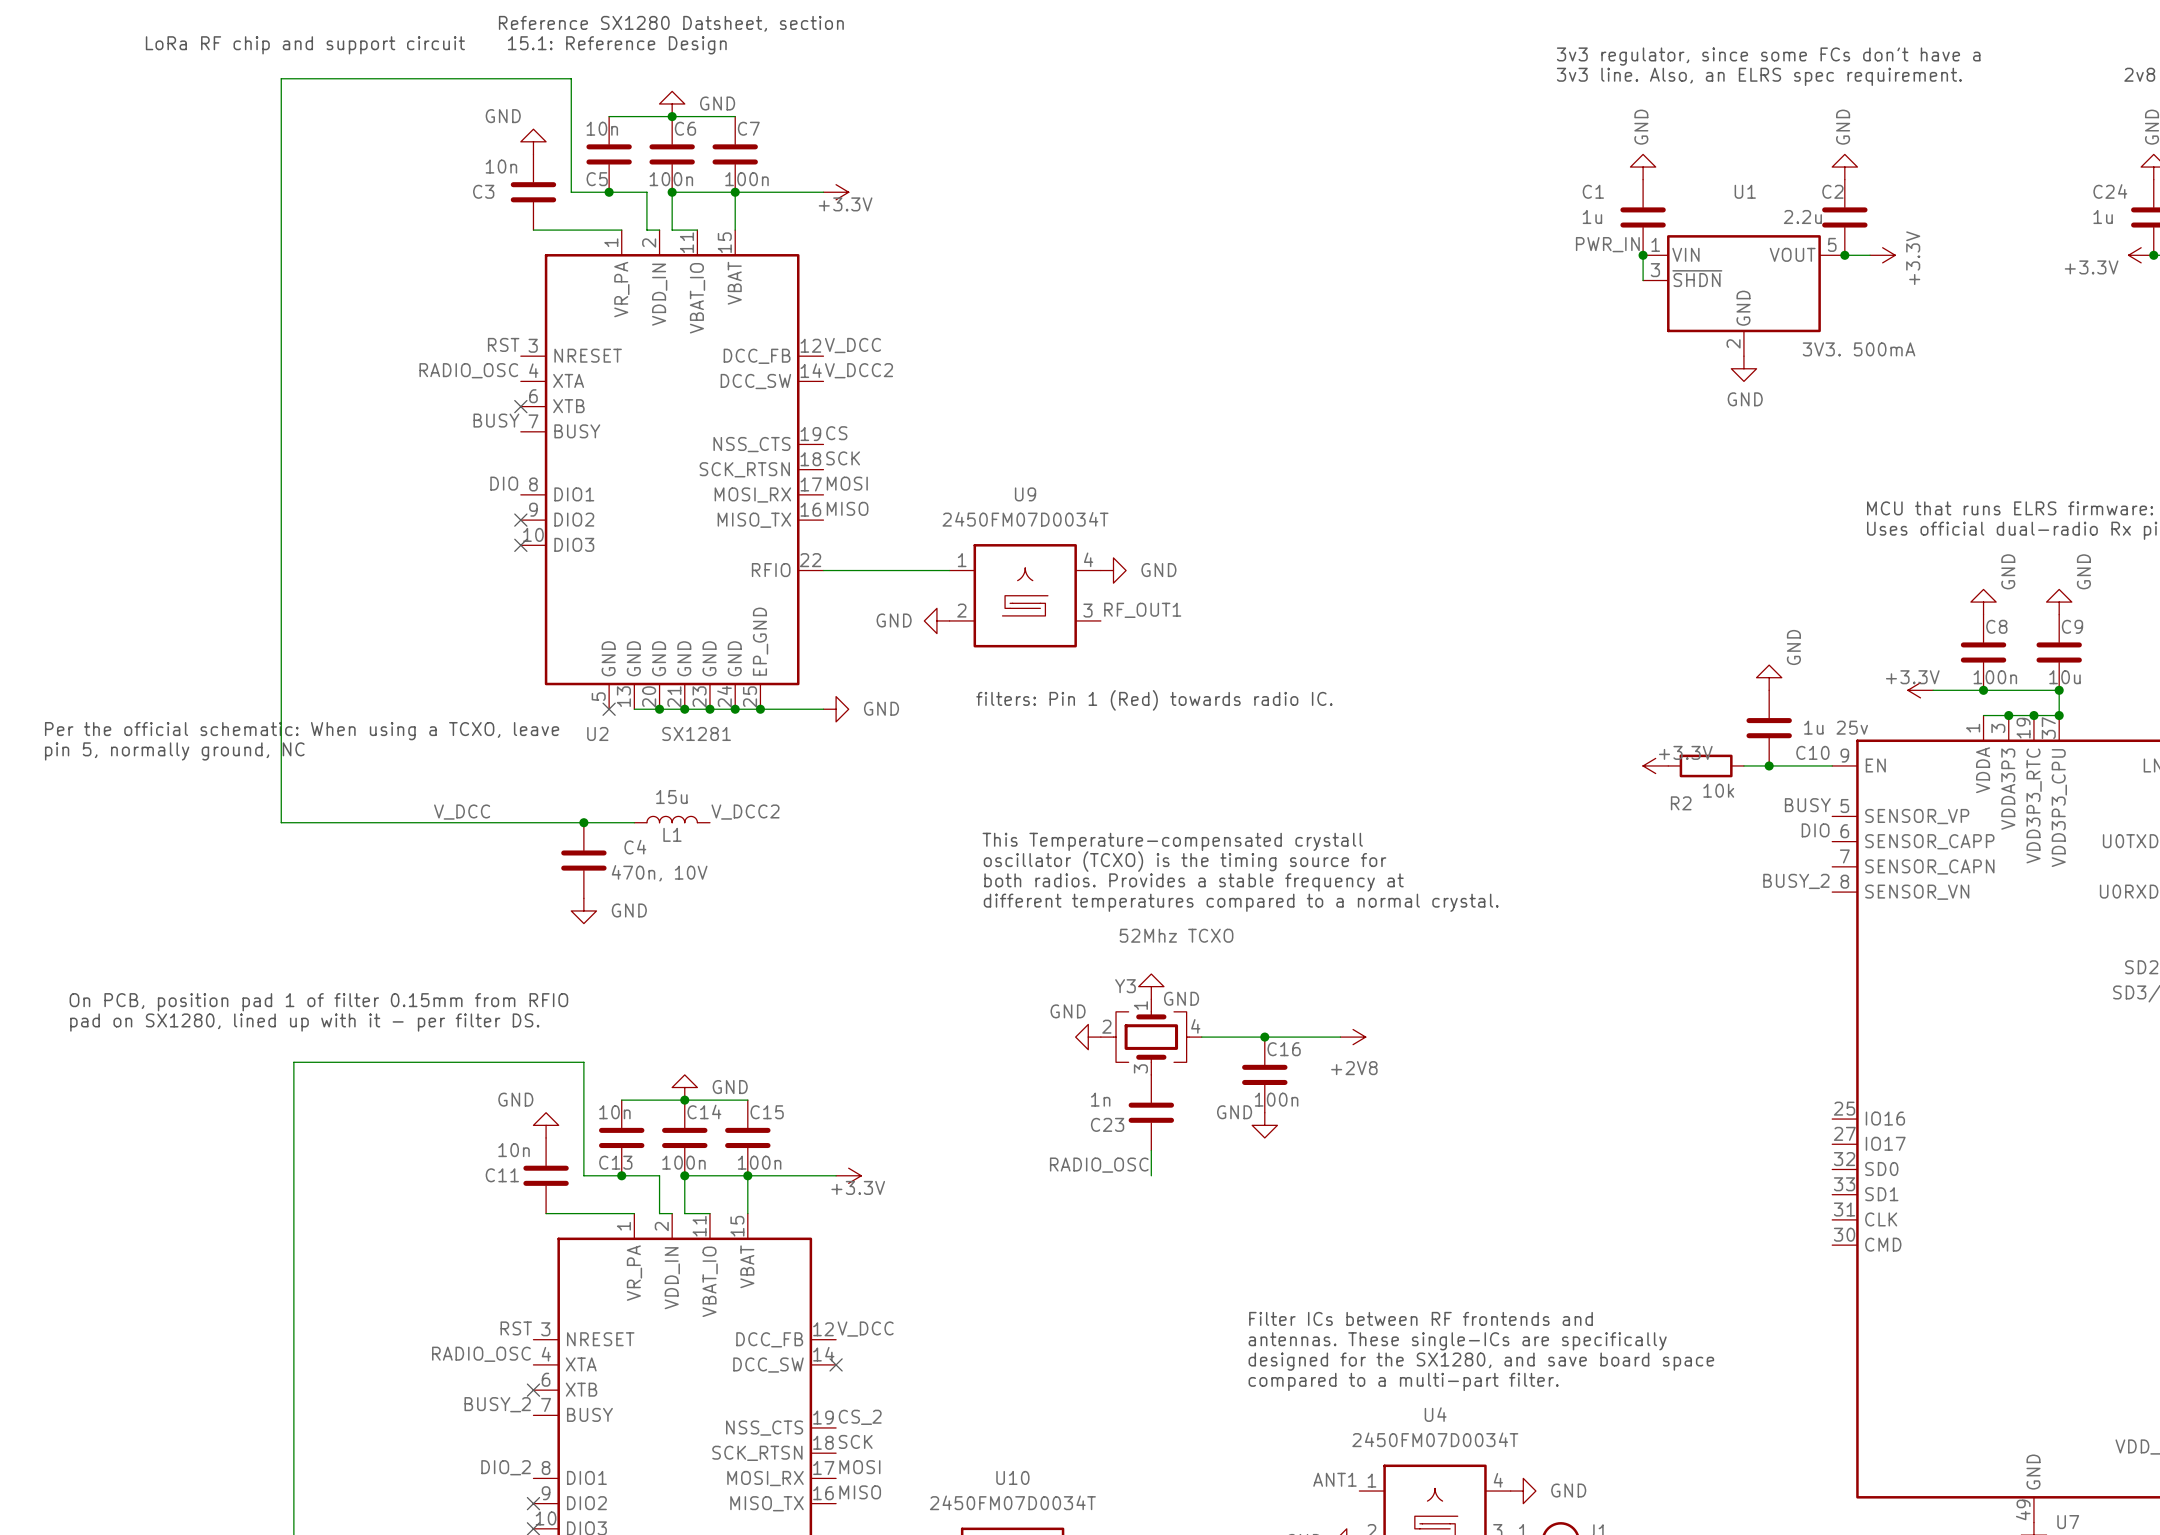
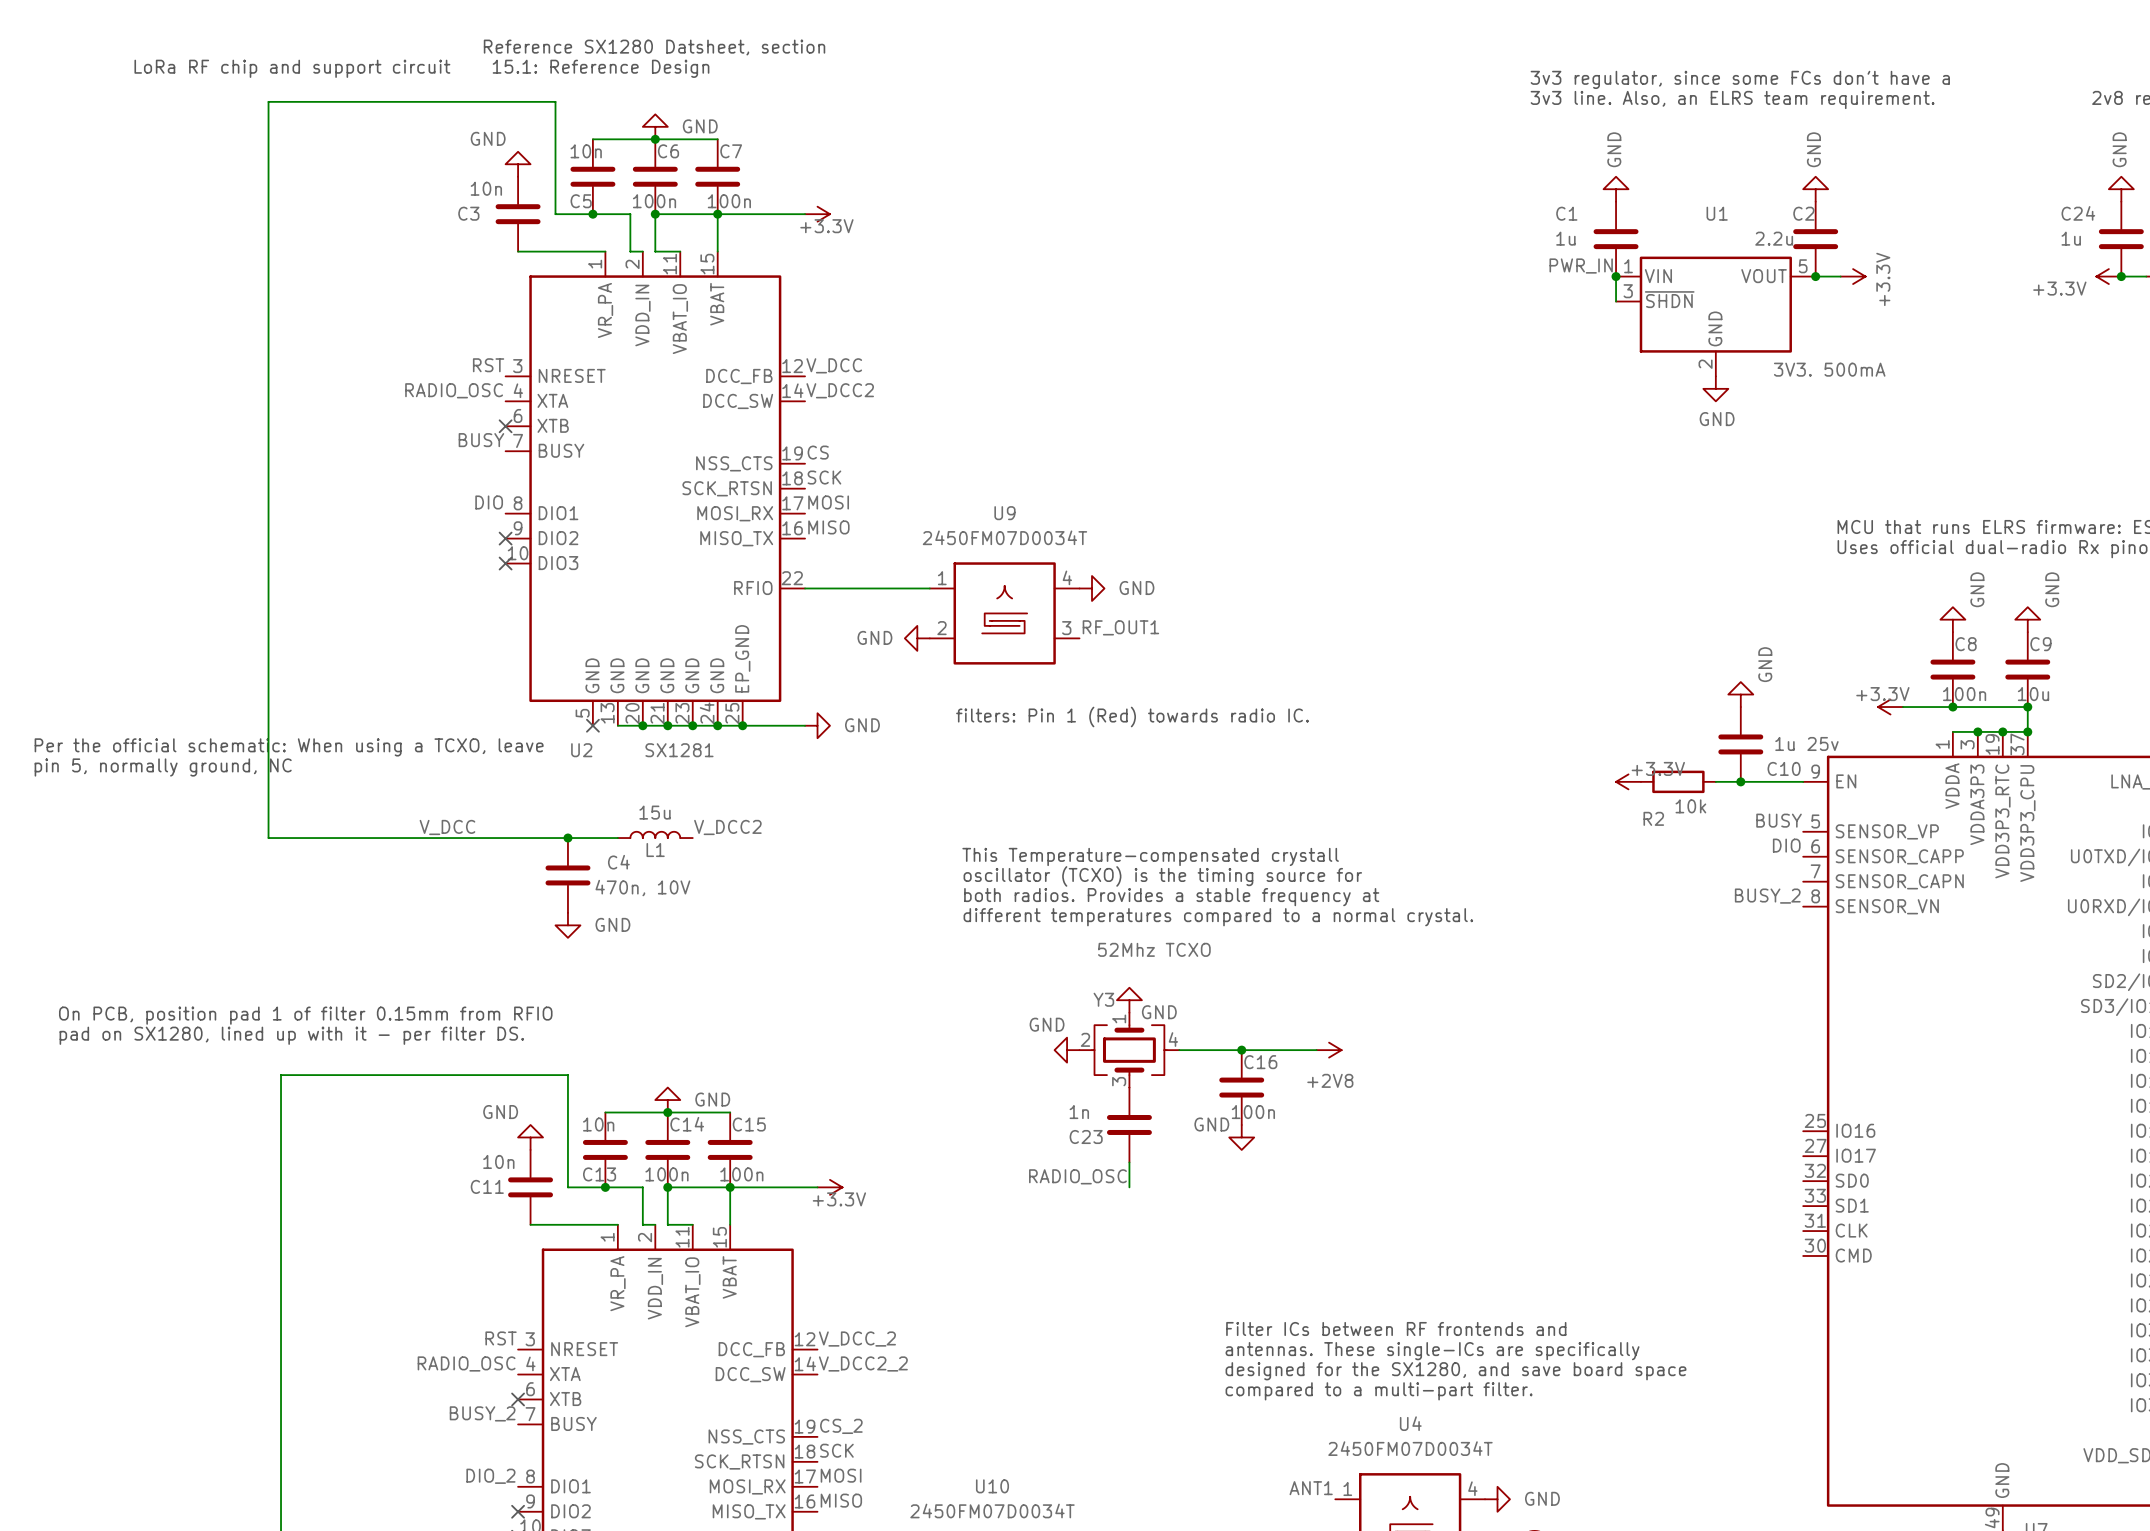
text: 3v3 line. Also, an ELRS spec requirement. (1759, 76) -> 3v3 line. Also, an ELRS team requirement. (1732, 99)
label: V_DCC (865, 1329) -> V_DCC_2 (857, 1339)
label: none -> V_DCC2_2 (863, 1363)
no-connect mark: (836, 1364) -> none

